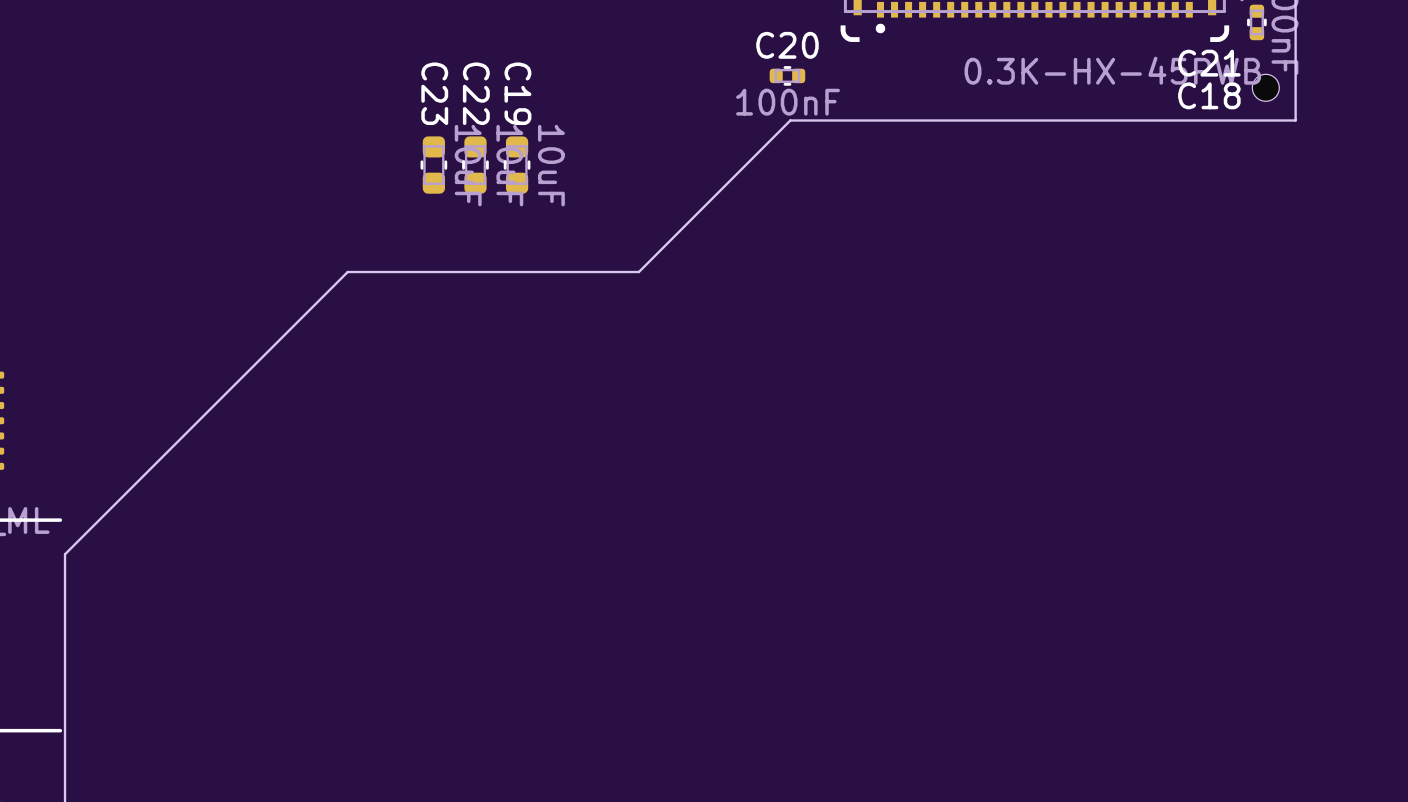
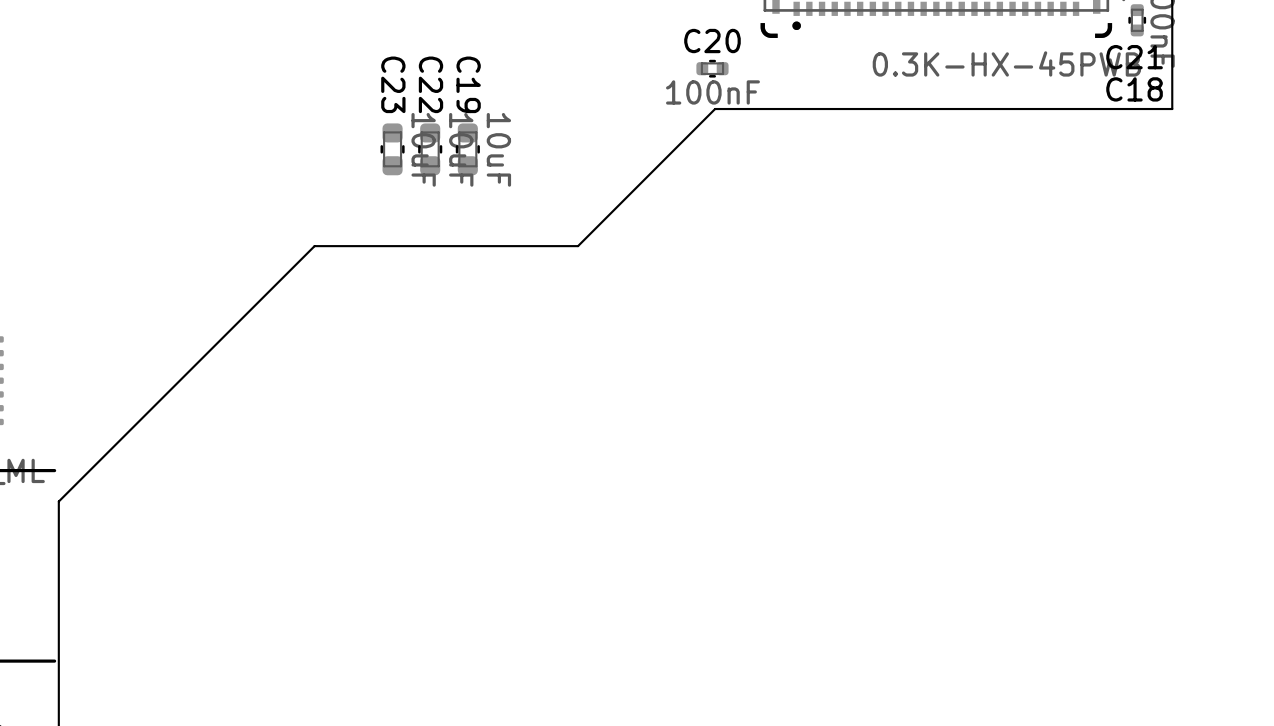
C21 name position: C21 (1209, 63) -> C21 (1134, 57)
part: (1265, 87) -> none
C18 name position: C18 (1209, 95) -> C18 (1134, 89)

